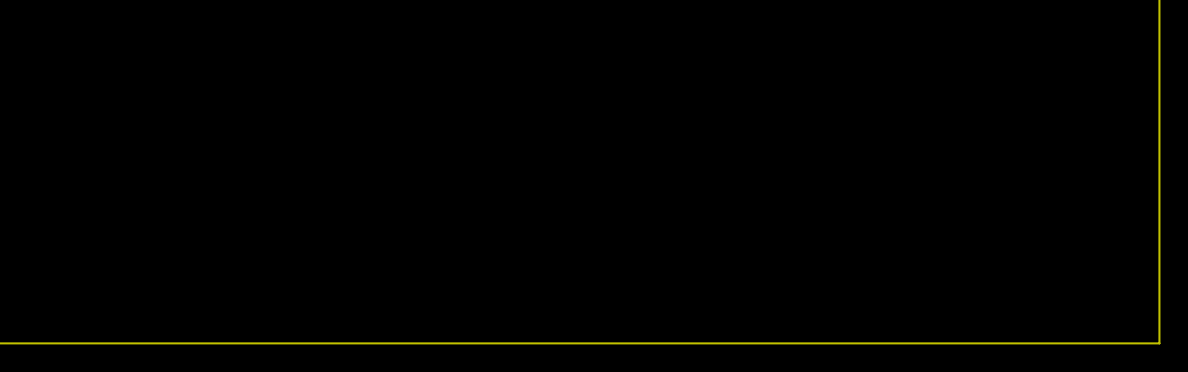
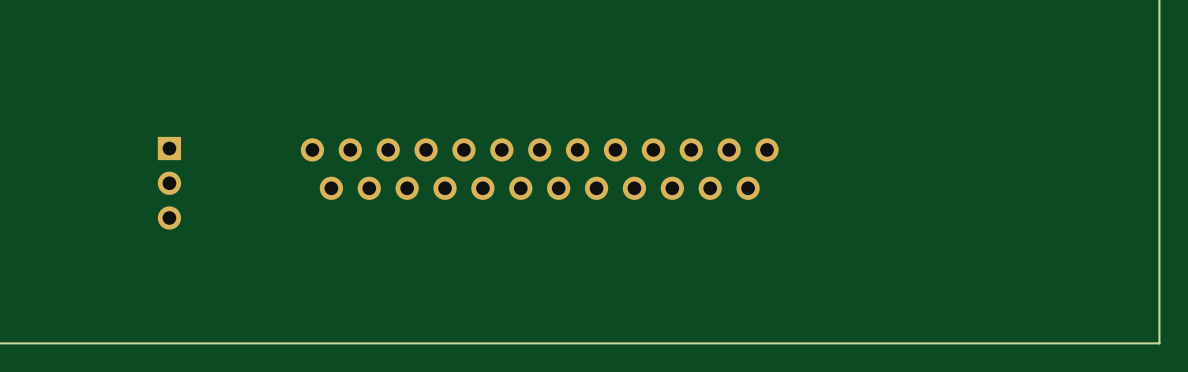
part: none -> (539, 169)
part: none -> (169, 183)

